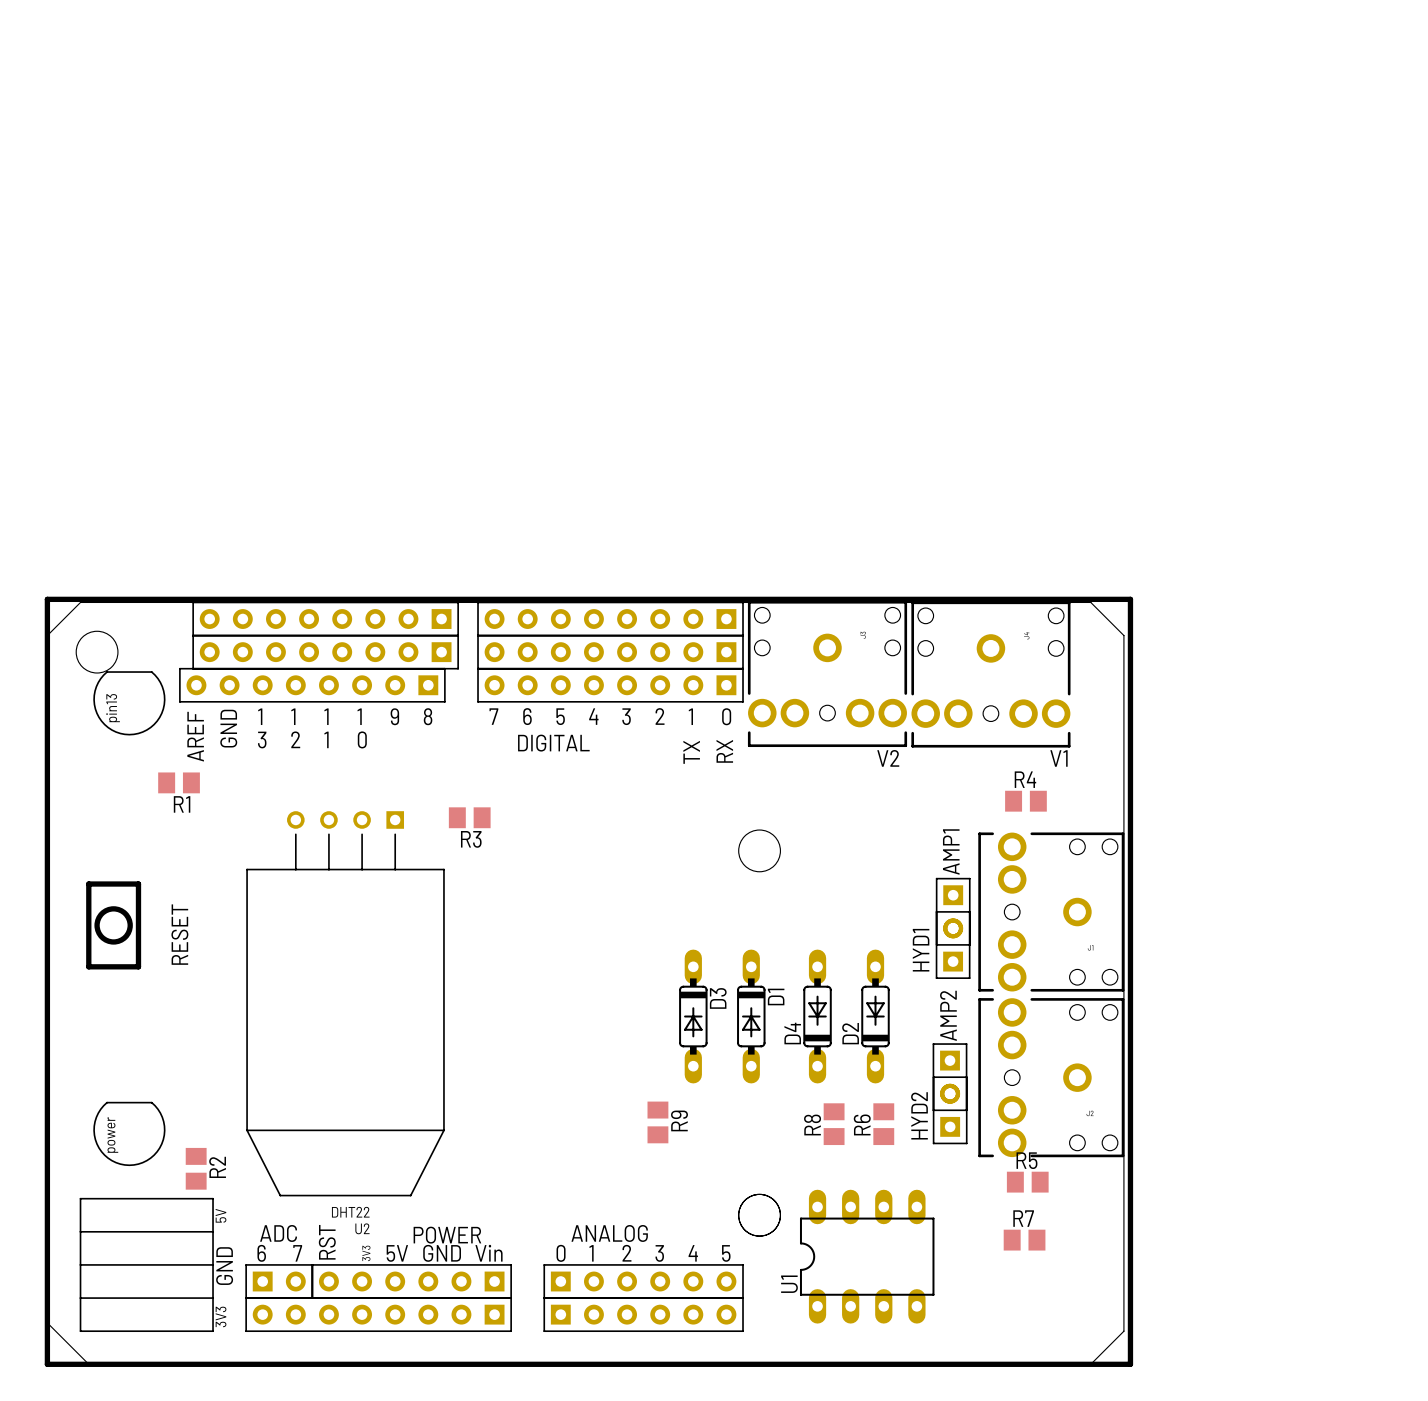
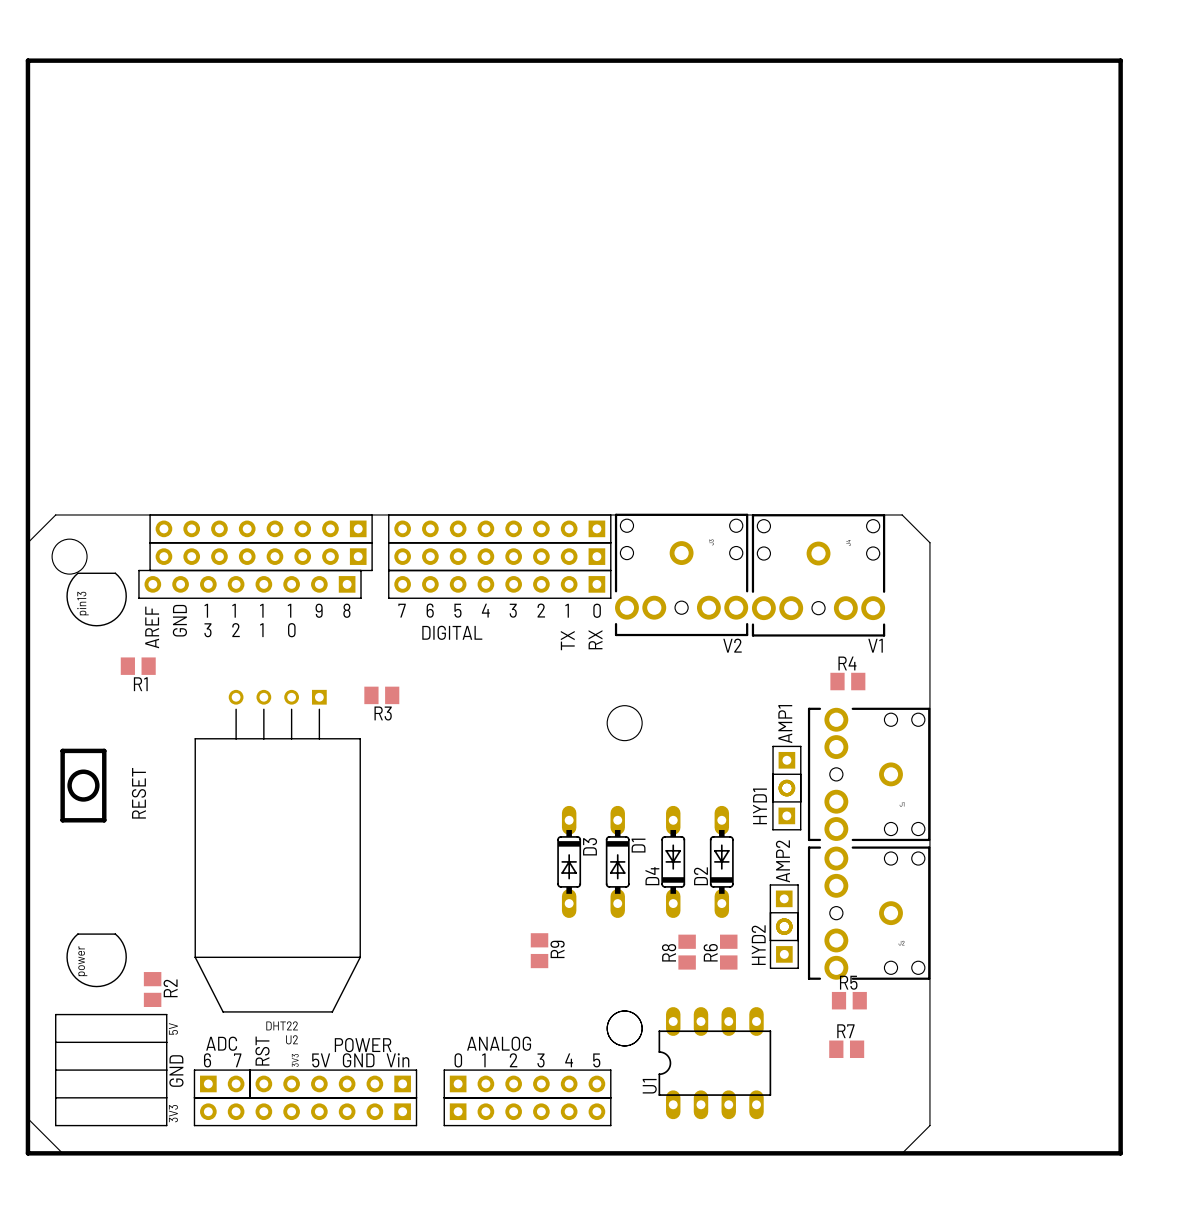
board edge: (47, 599) (1130, 599) (1130, 1364) -> (27, 512) (27, 60) (1120, 60) (1120, 1153) (935, 1153)

